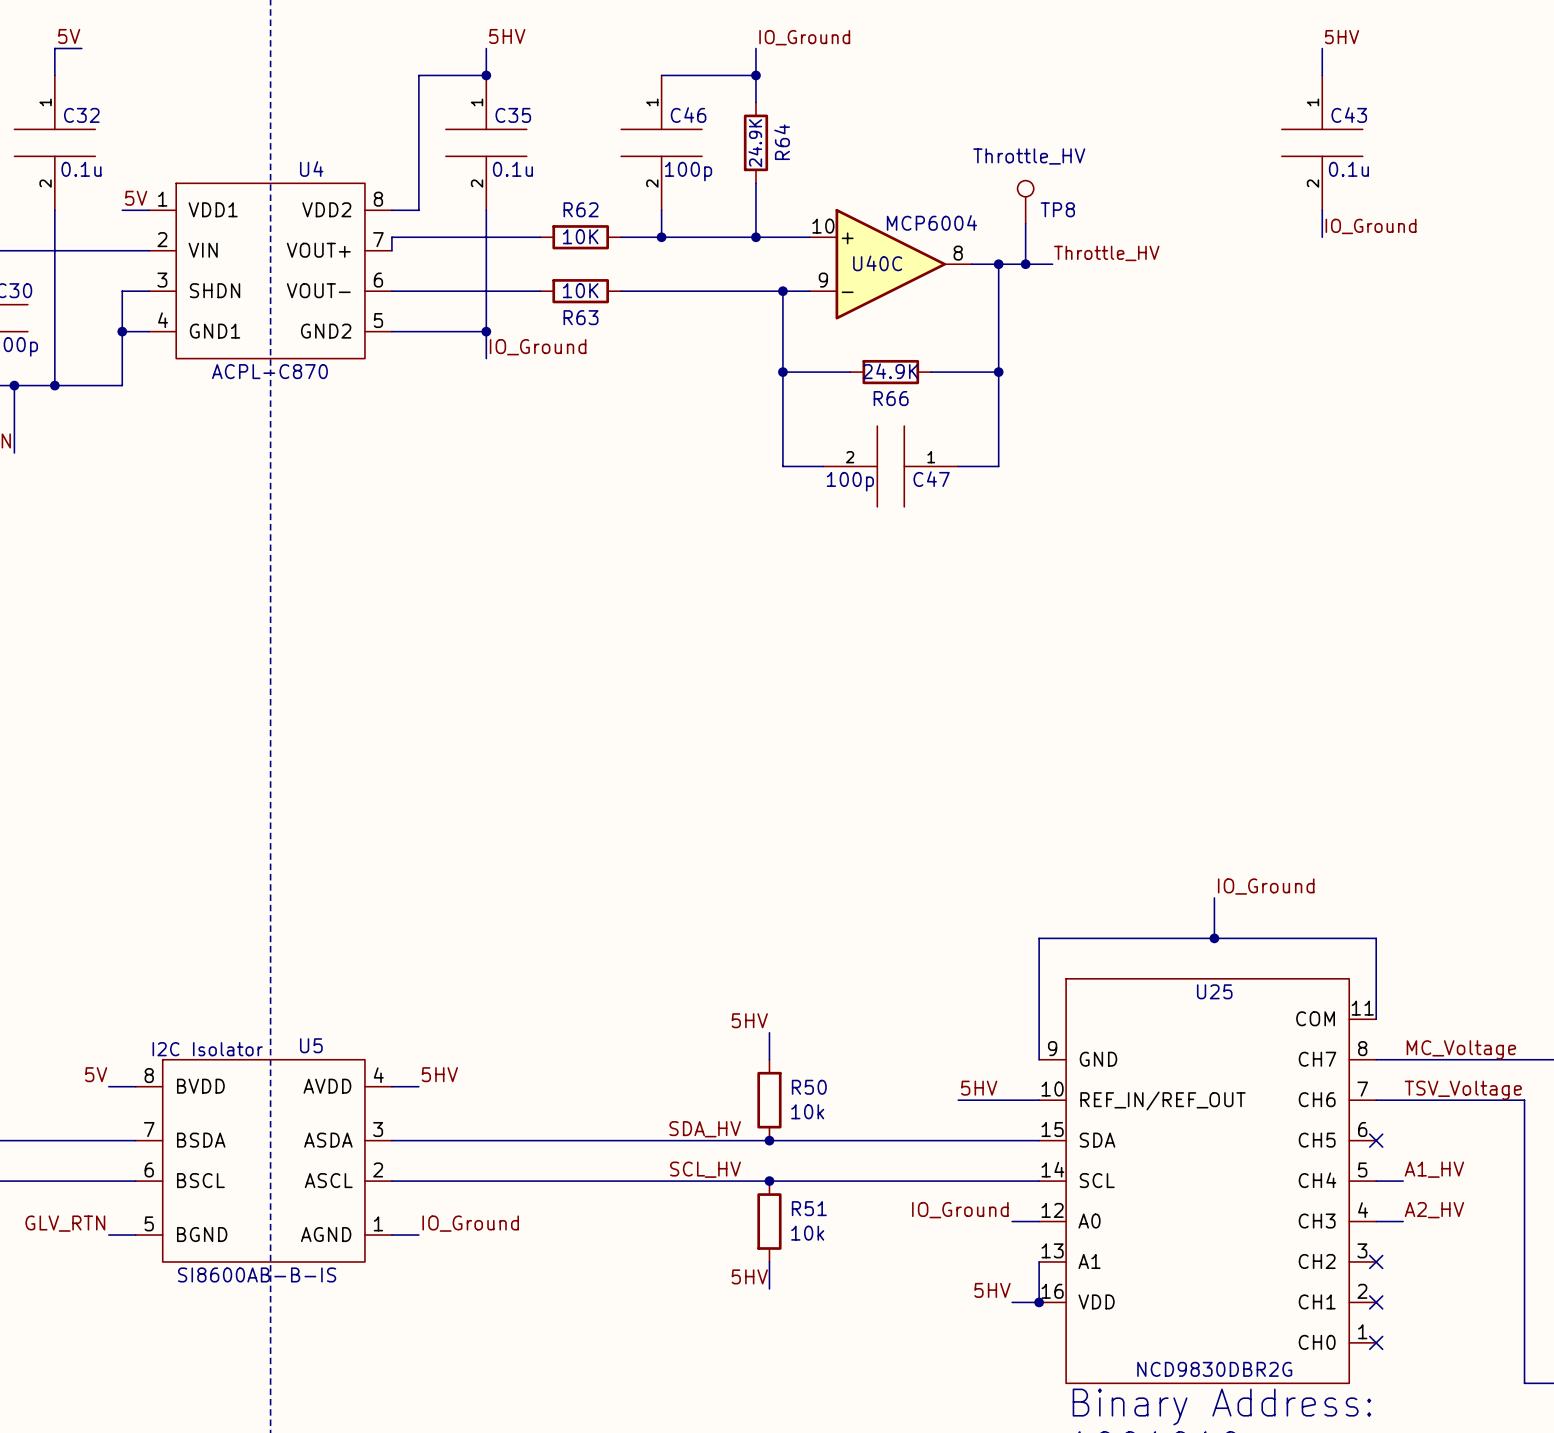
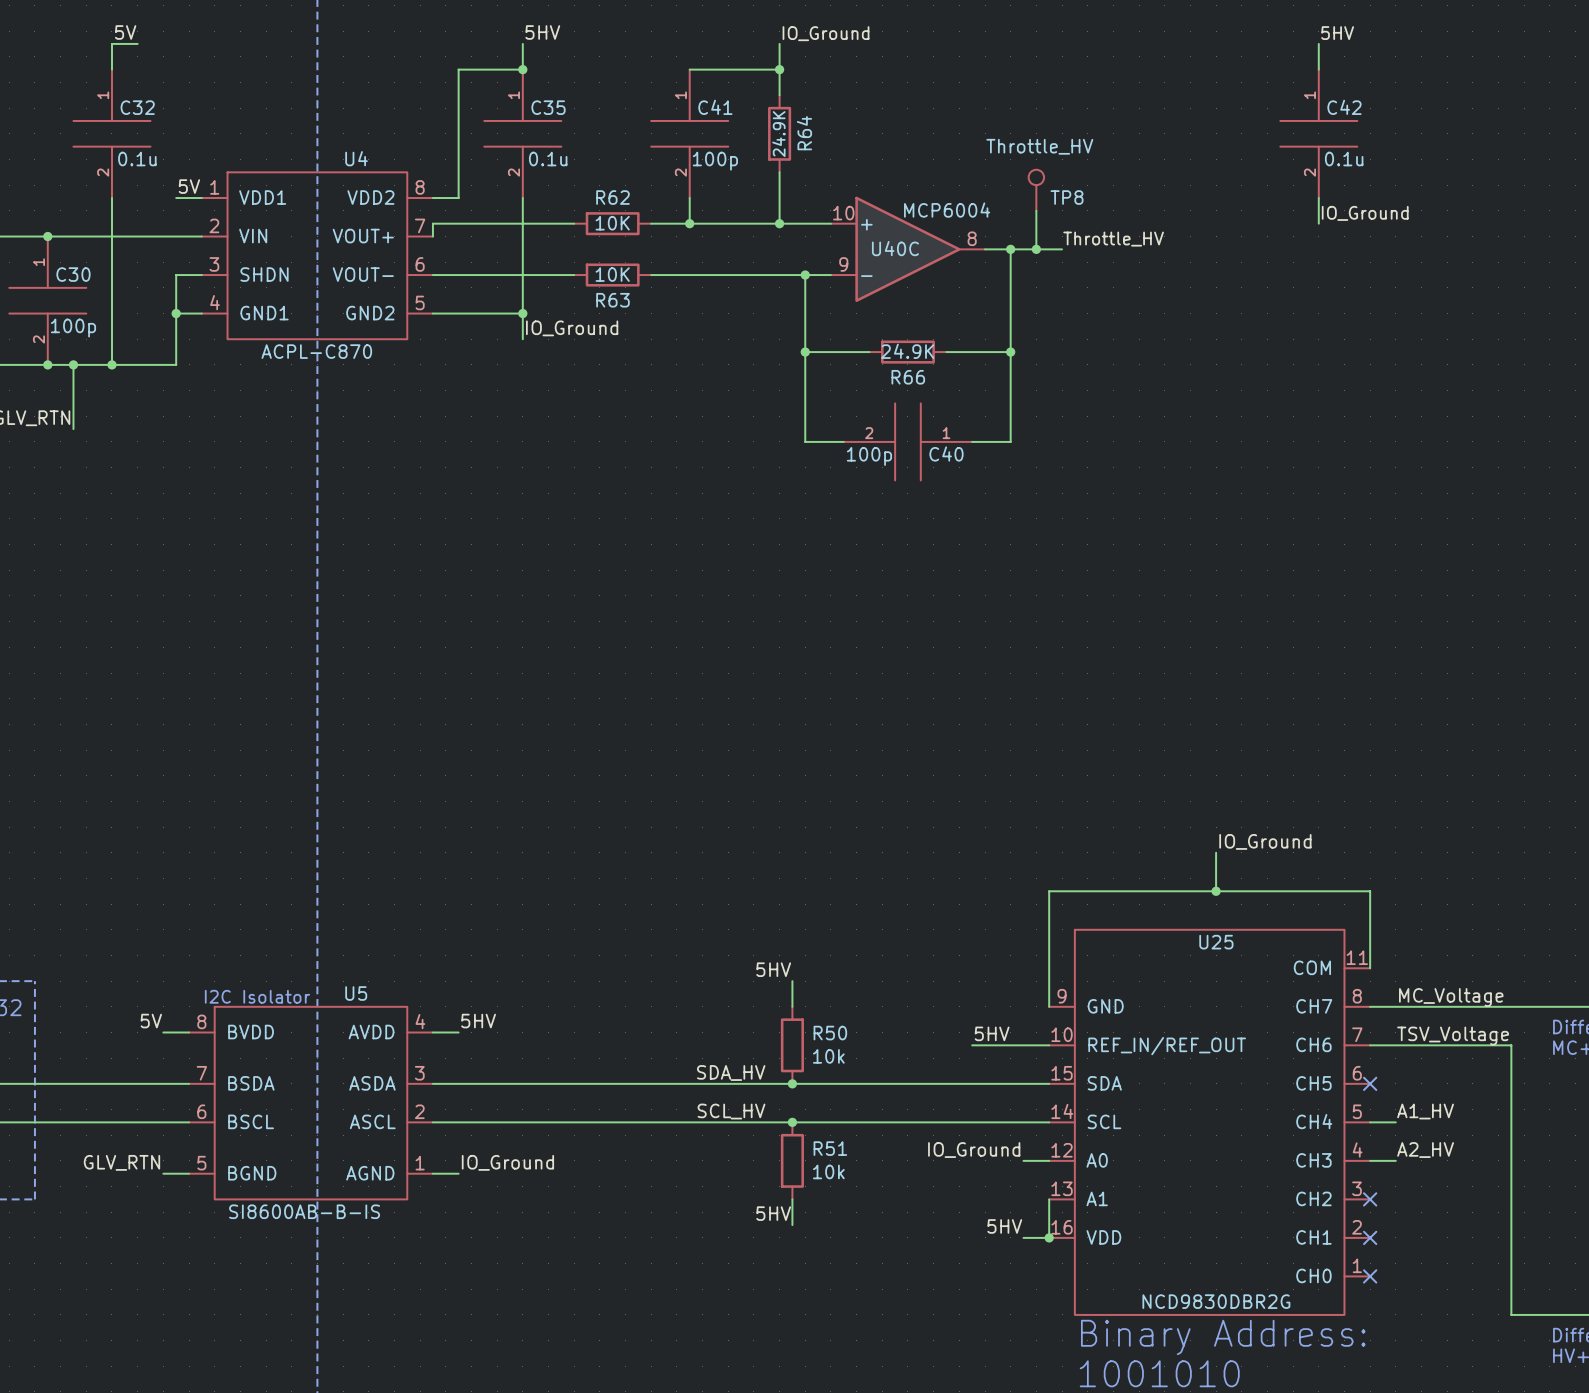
C46 name: C46 (688, 115) -> C41 (715, 107)
C43 name: C43 (1349, 115) -> C42 (1344, 107)
C47 name: C47 (931, 479) -> C40 (946, 453)

